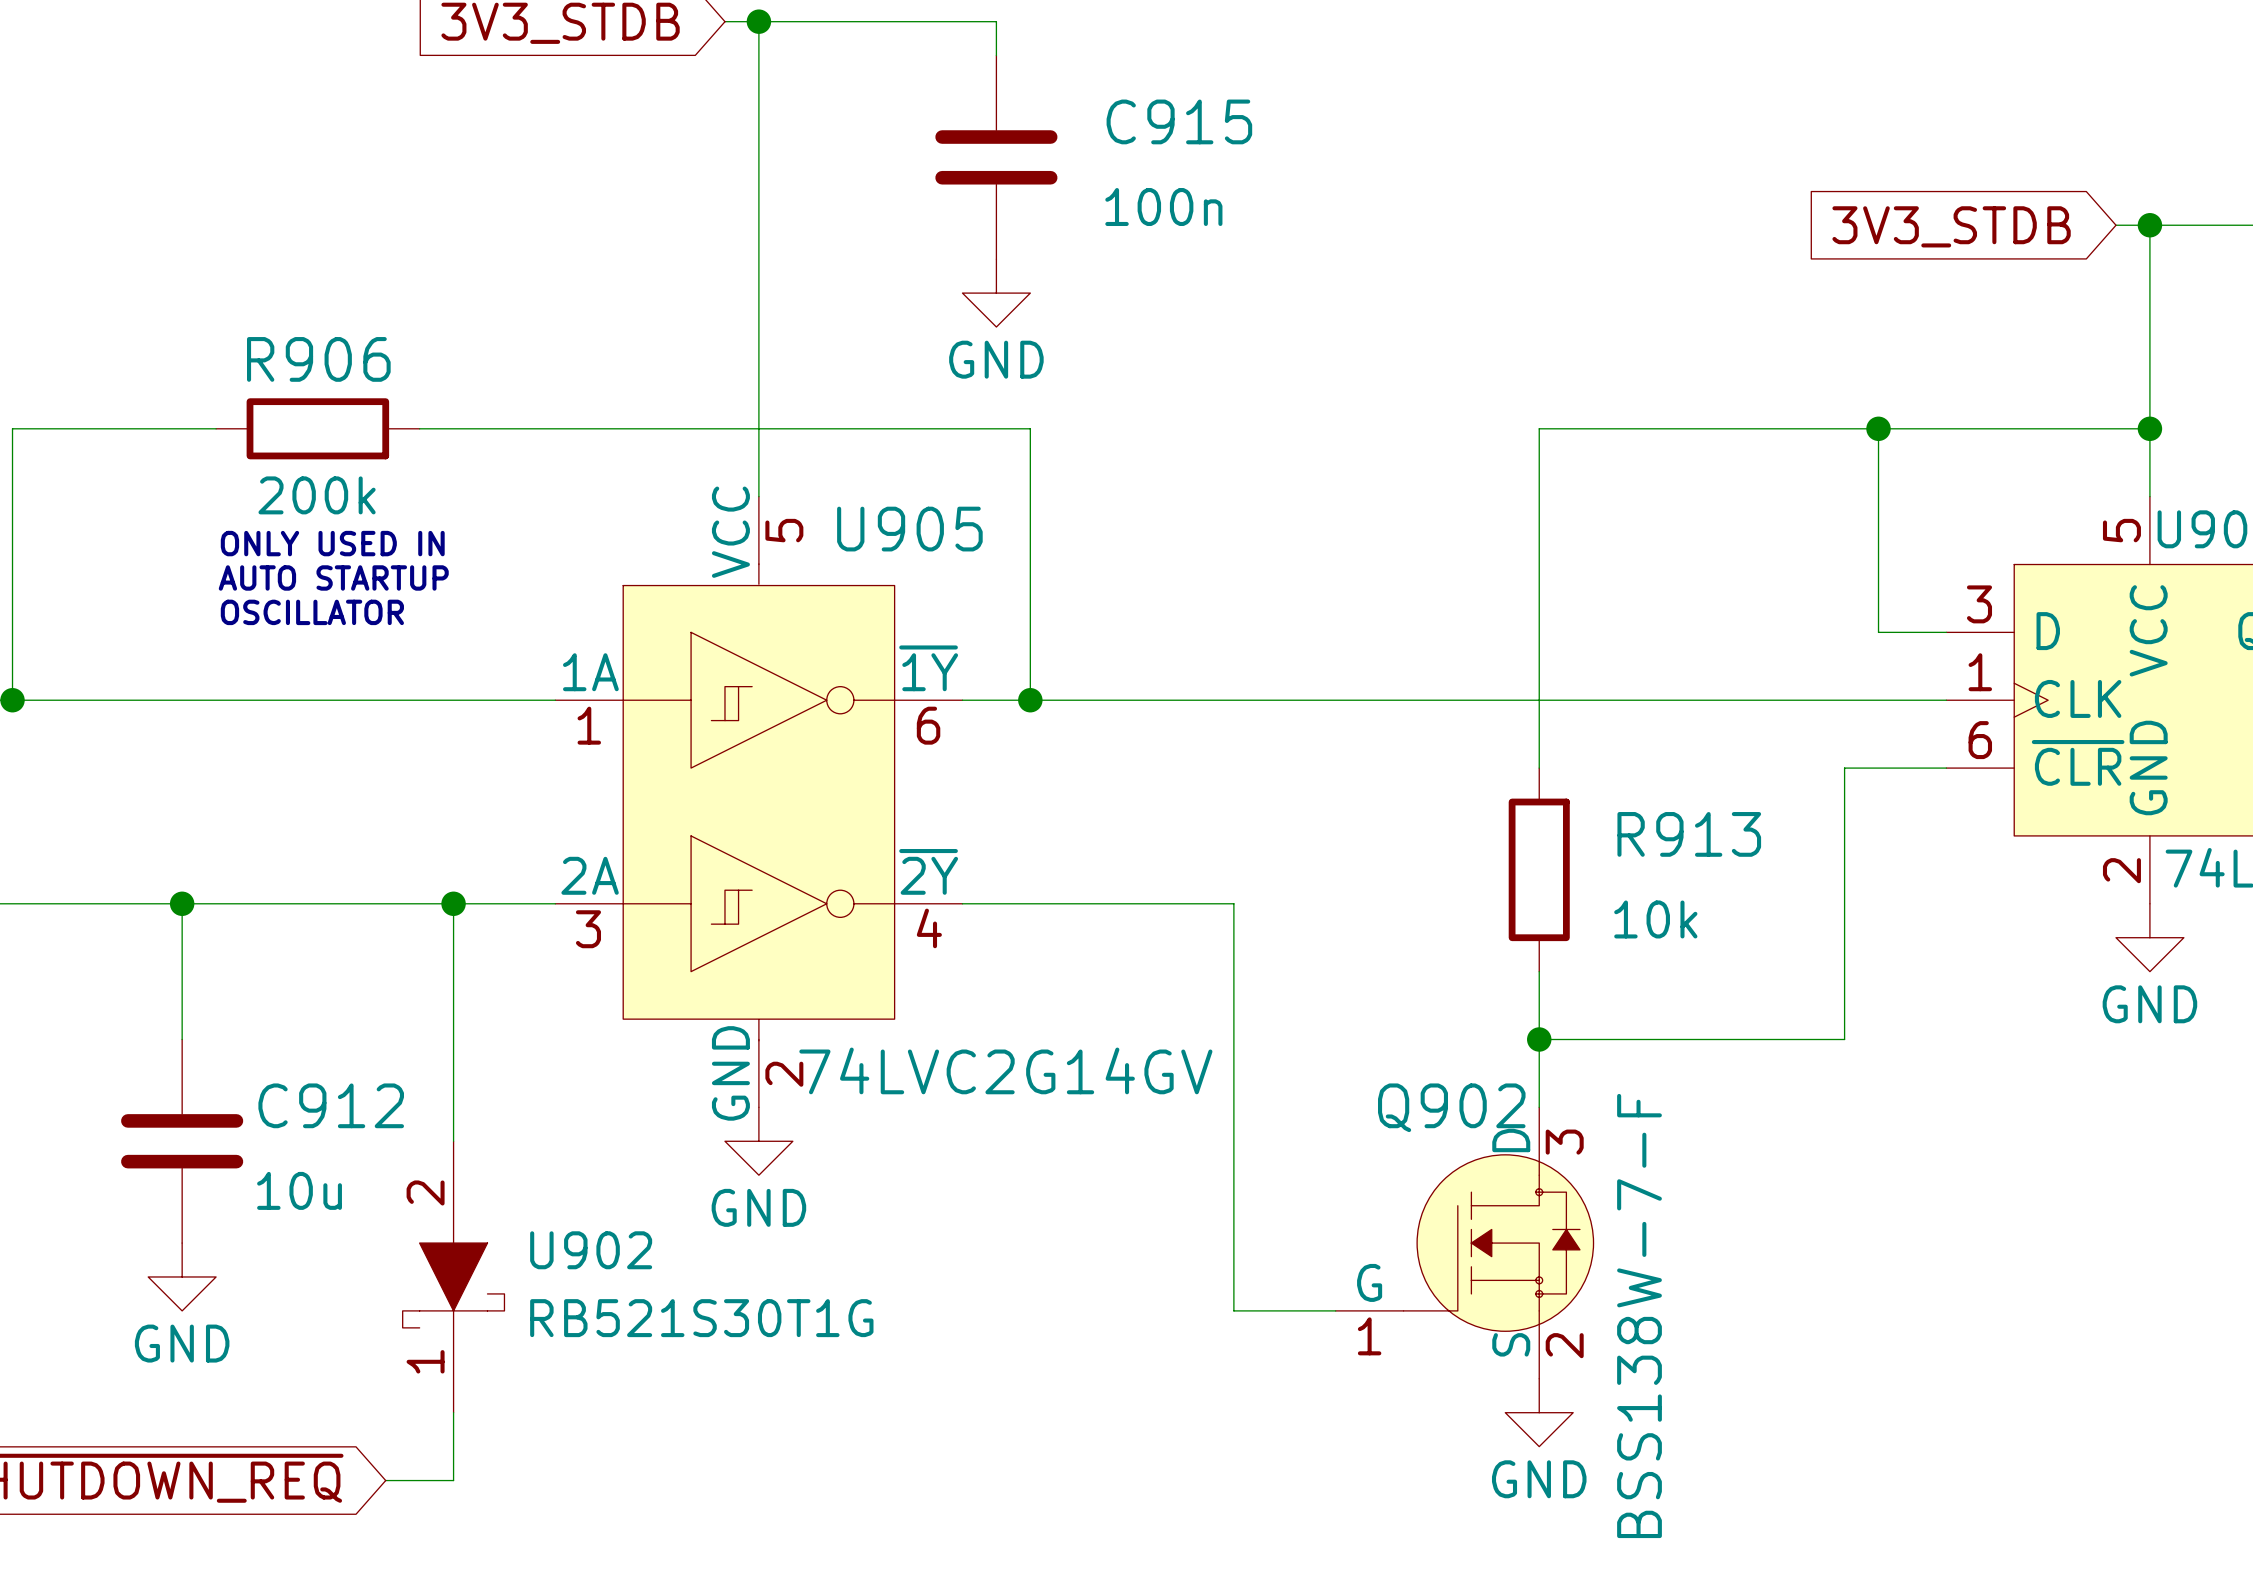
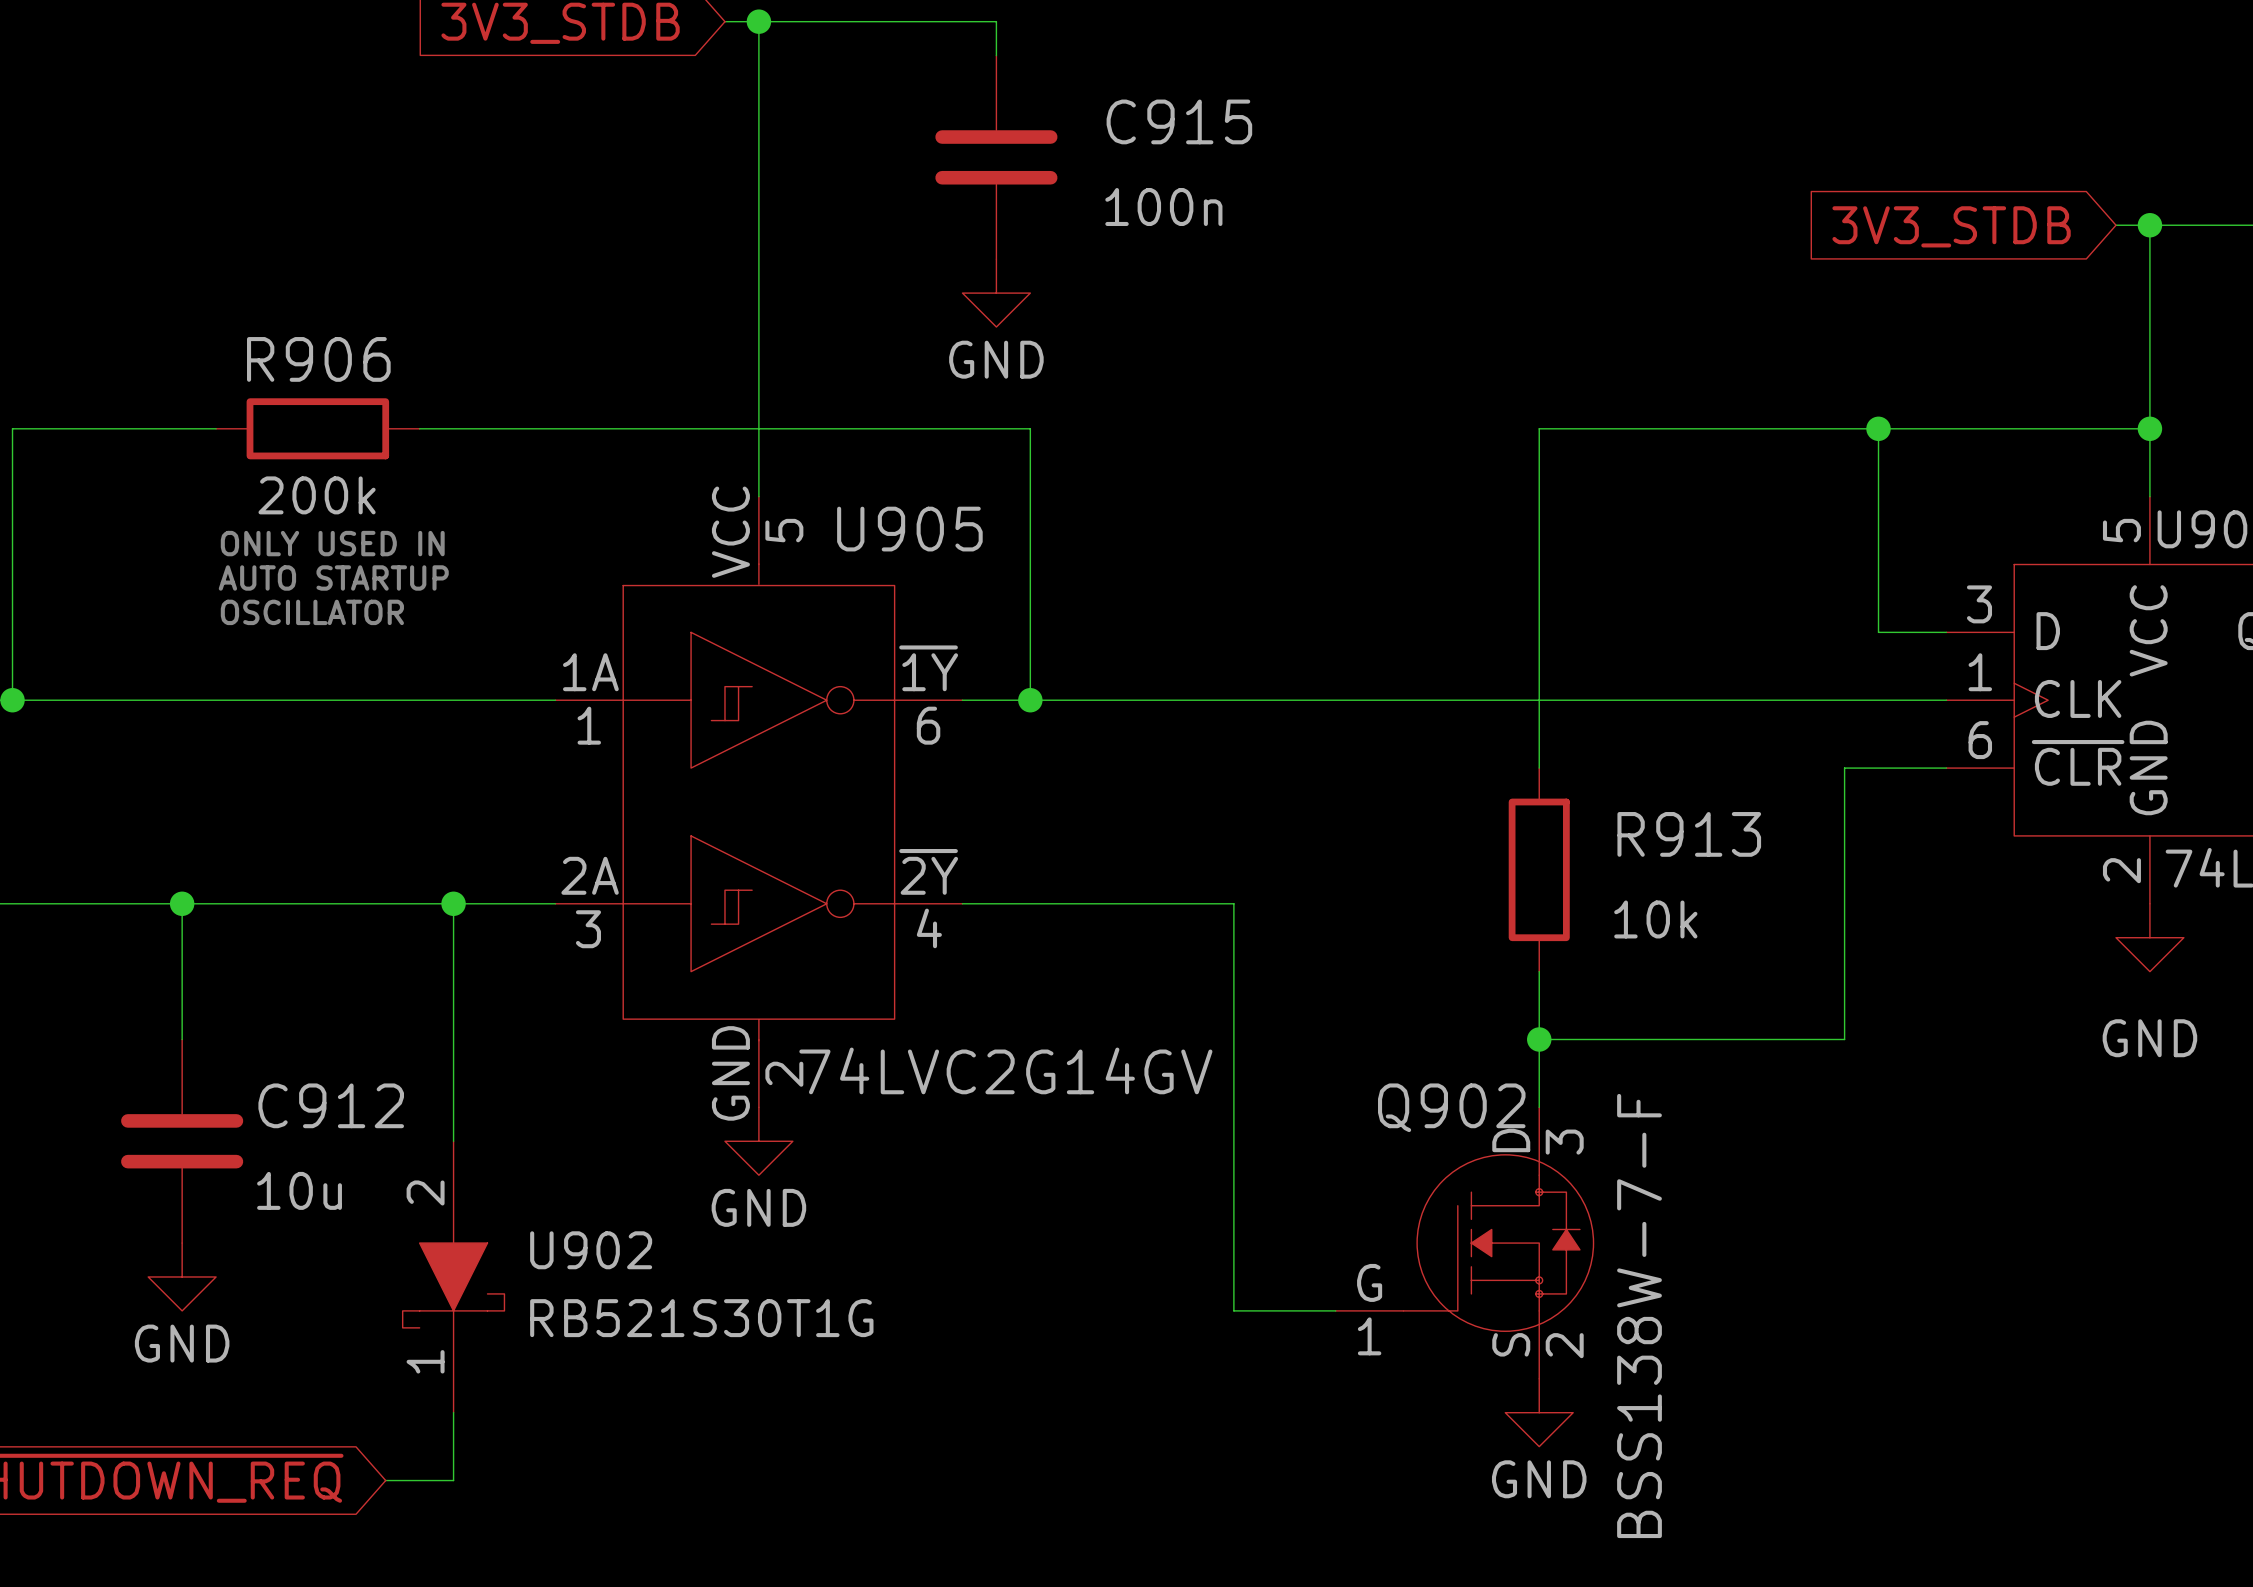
power symbol text position: GND (2149, 1004) -> GND (2149, 1038)

